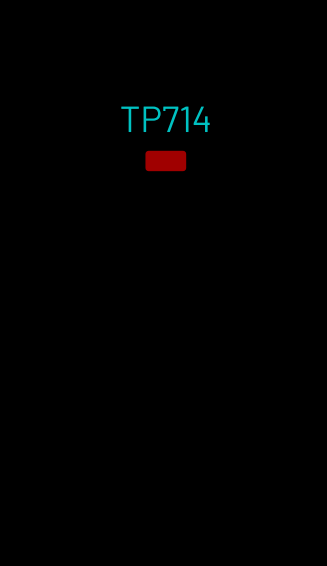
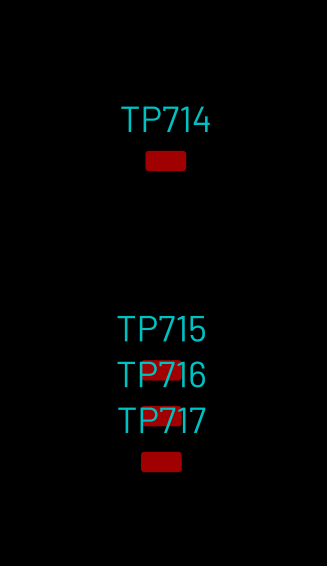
TP715: none -> (161, 370)
TP716: none -> (161, 416)
TP717: none -> (161, 461)

